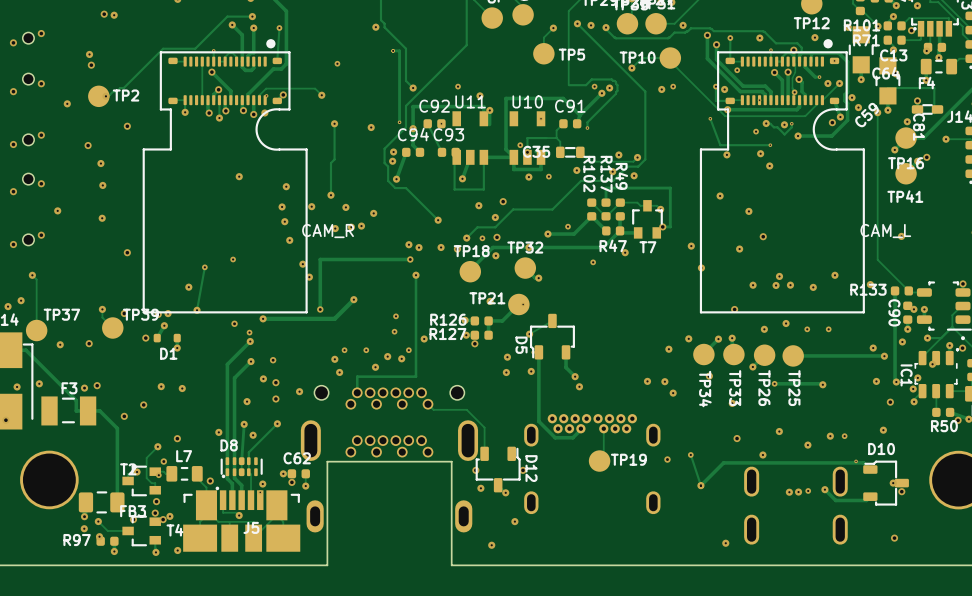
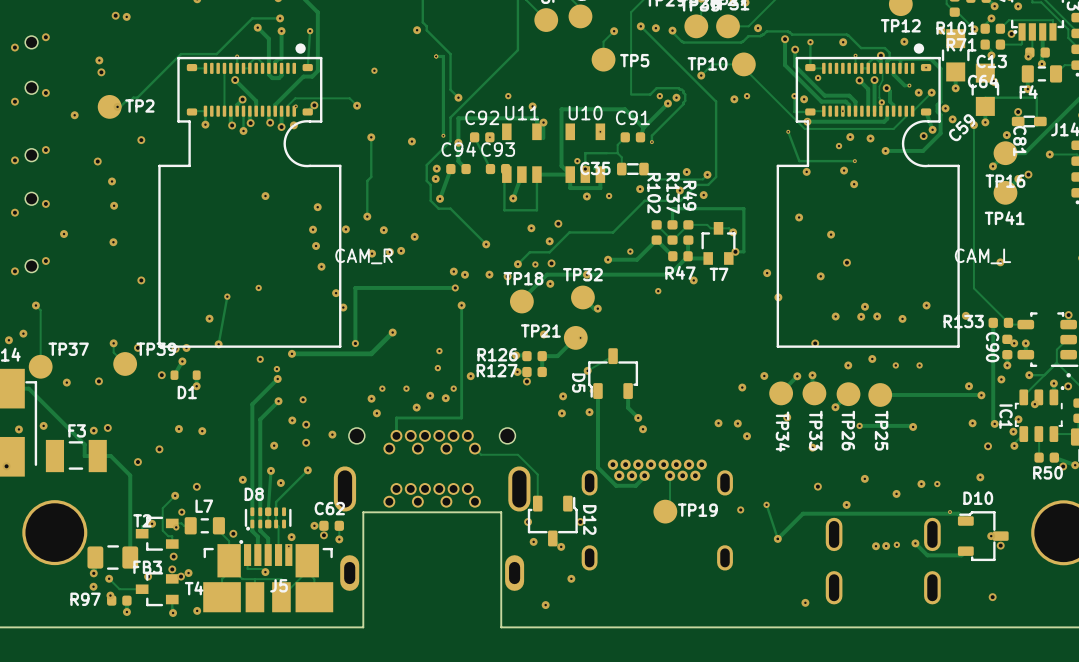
track: (791, 123) (791, 127) (784, 134) (777, 127) (766, 123) -> none
via: (791, 123) -> none

